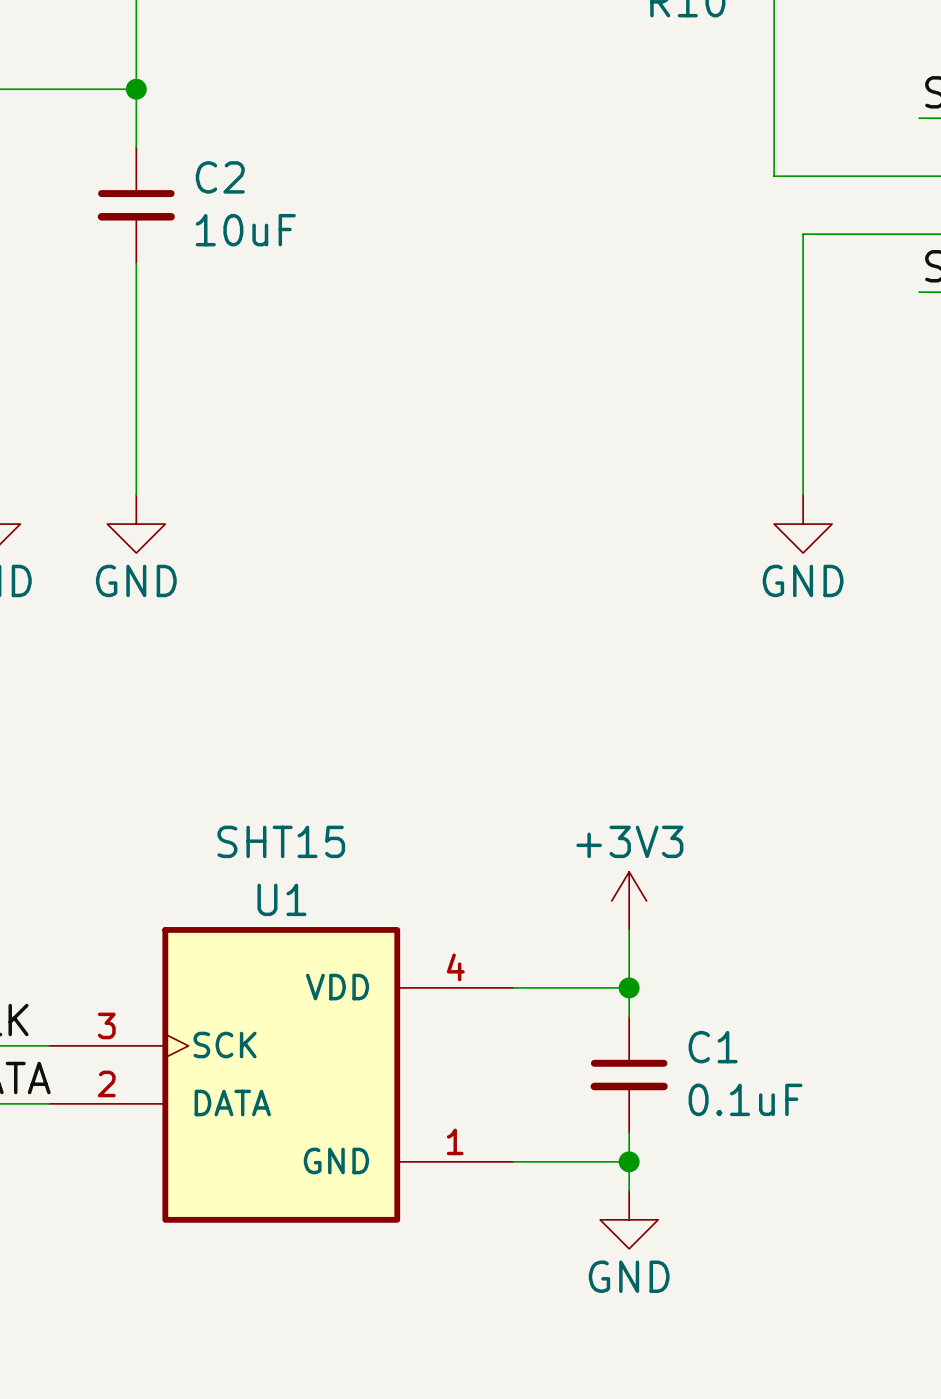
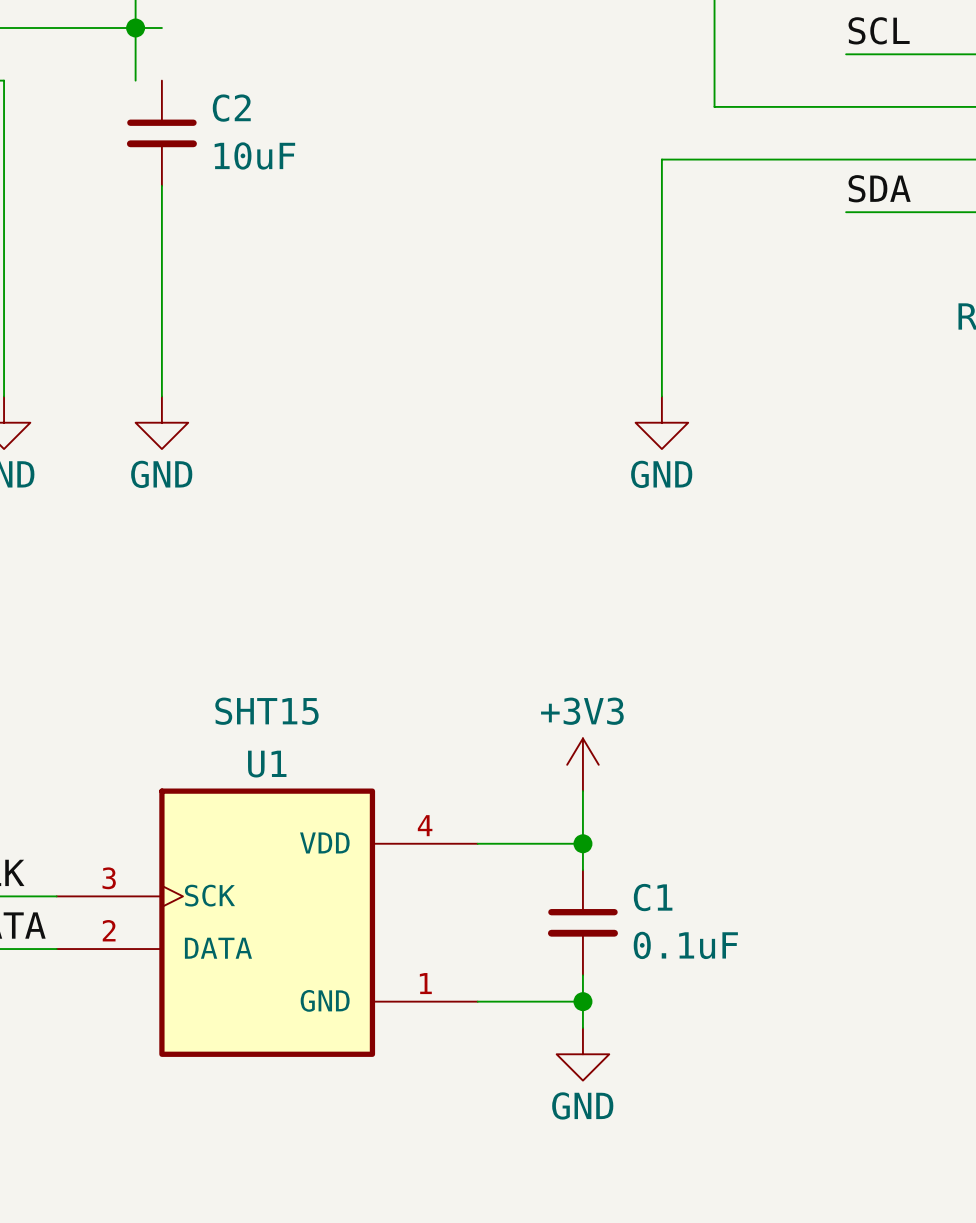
wire: none -> (135, 28) (161, 28)
C2 position: (136, 205) -> (161, 133)
wire: (803, 234) (803, 495) -> (740, 159) (661, 159) (661, 396)
wire: (136, 263) (136, 495) -> (161, 185) (161, 396)
power symbol position: GND (136, 524) -> GND (161, 422)
power symbol position: GND (803, 524) -> GND (661, 422)

